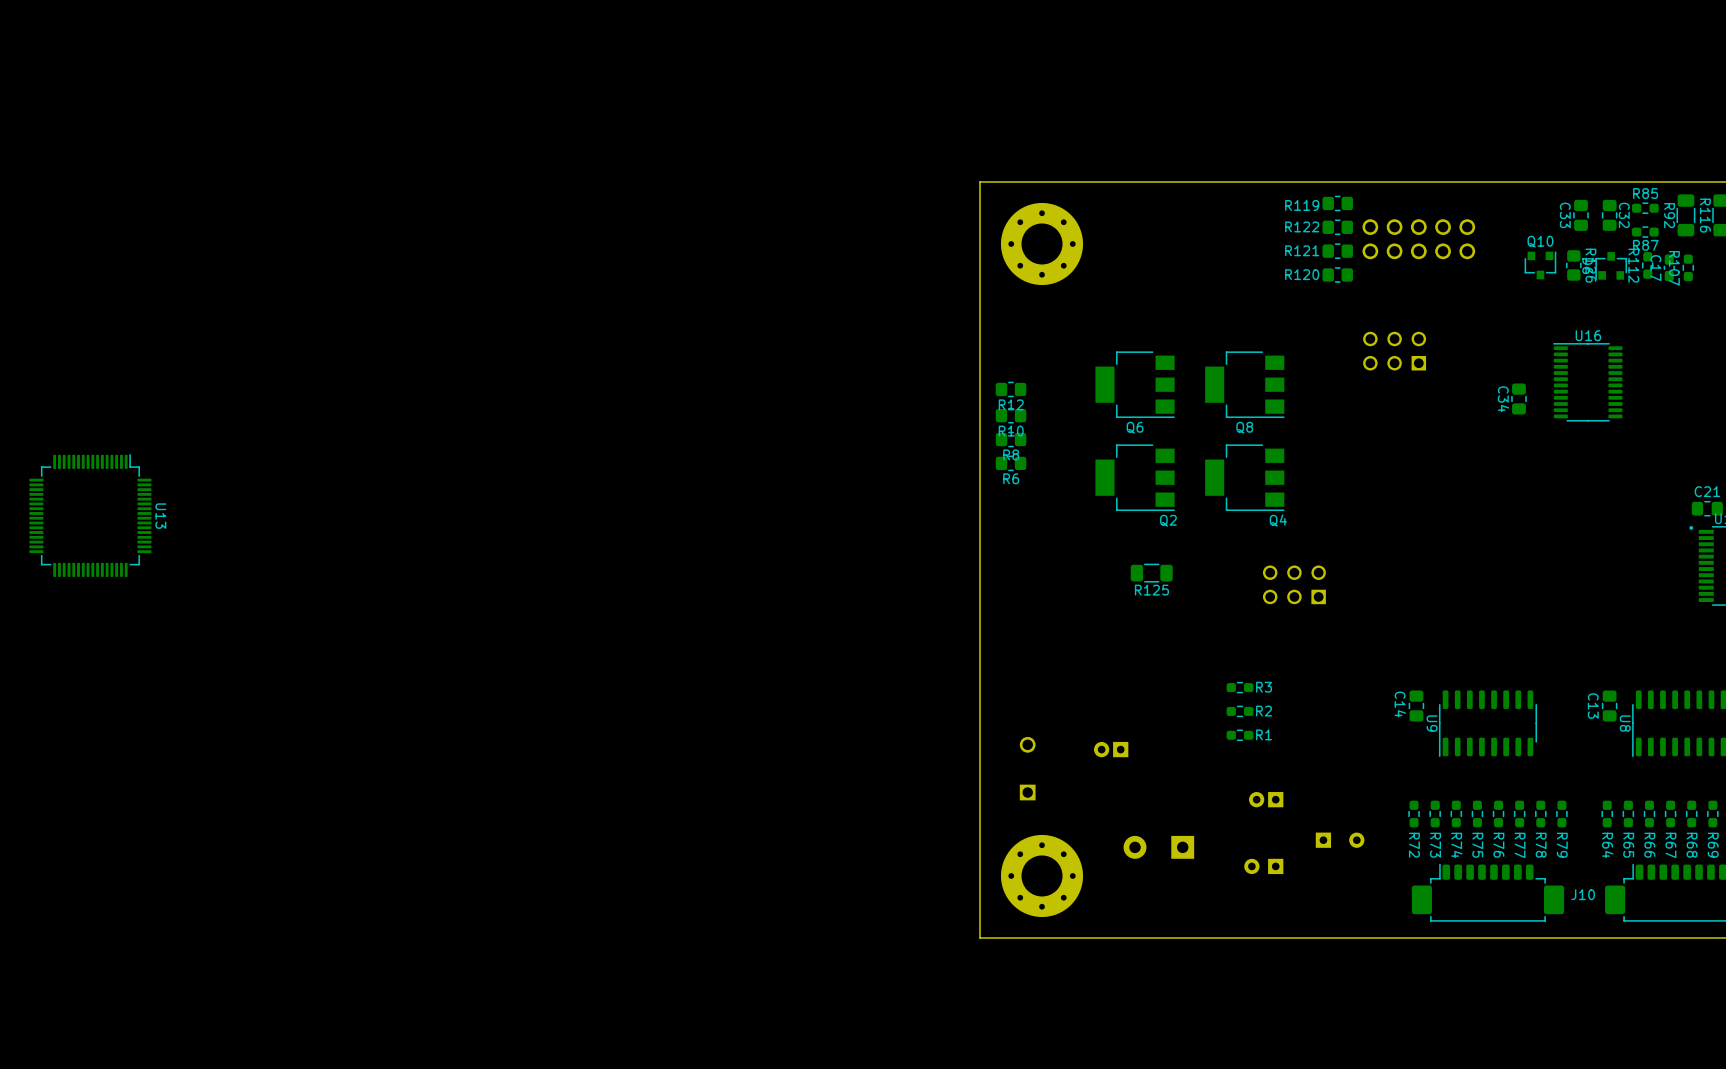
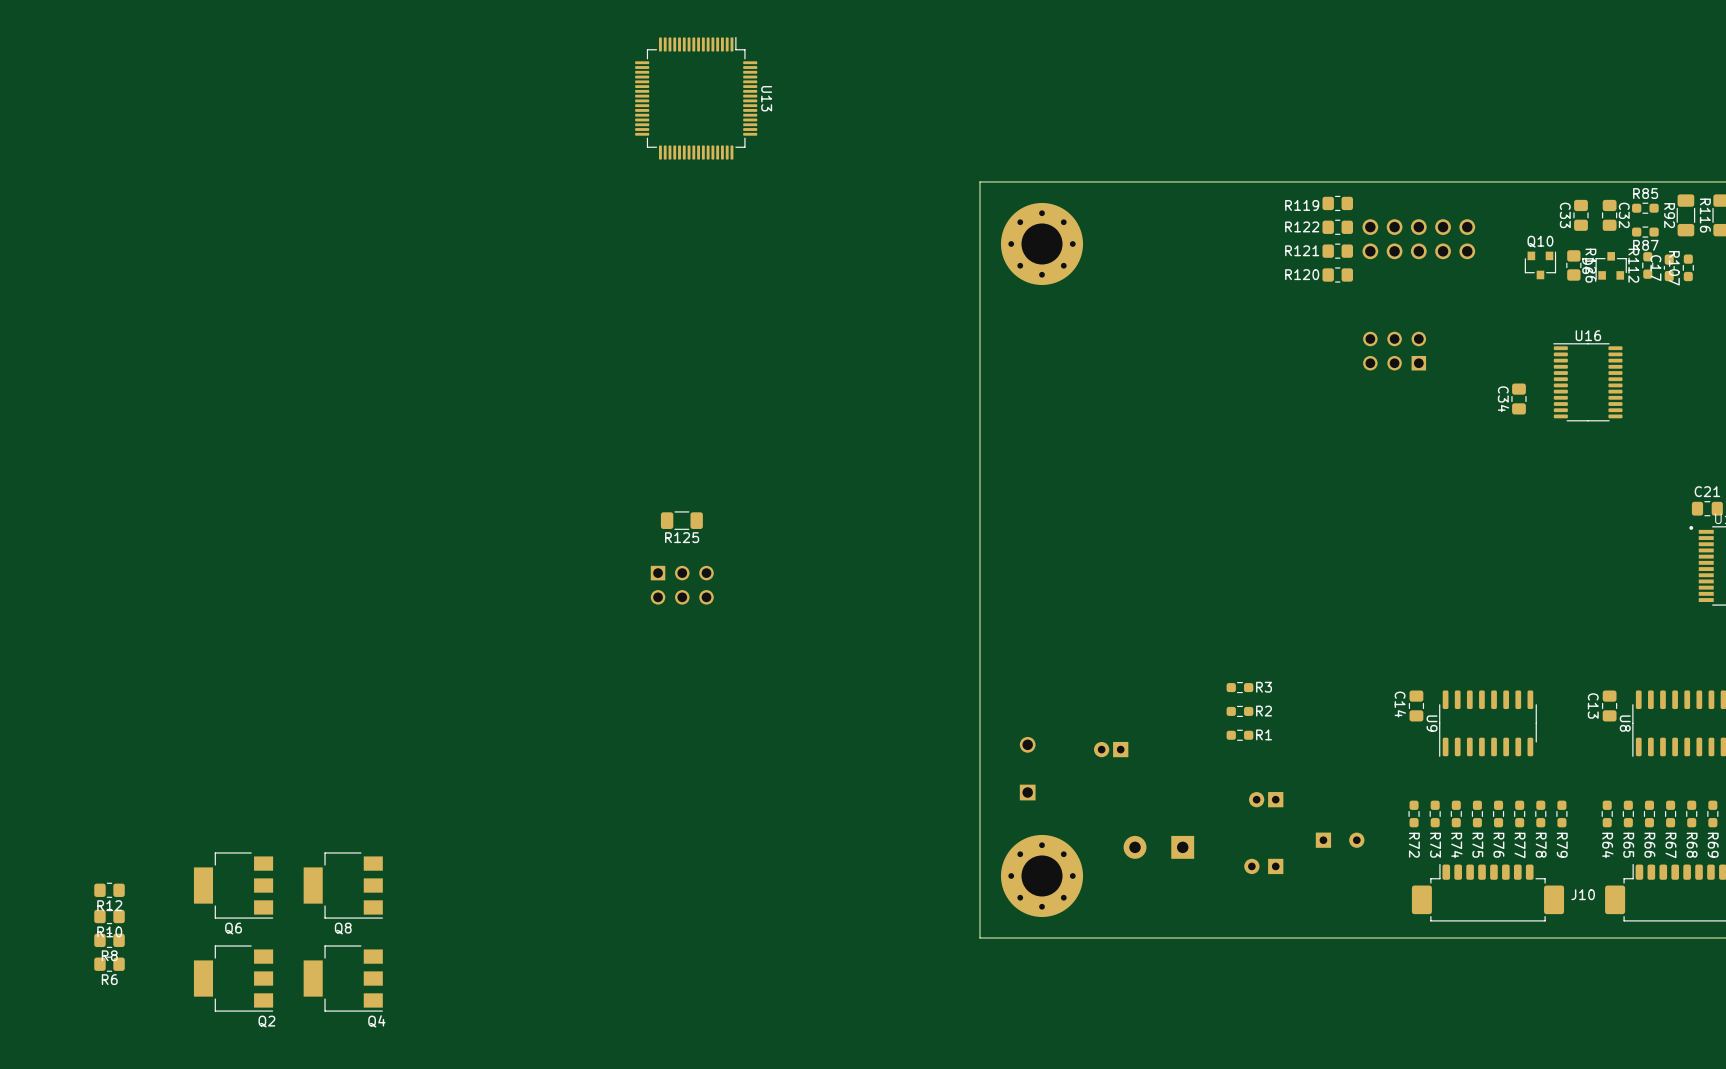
Q6 position: (1135, 384) -> (233, 885)
Q8 position: (1244, 384) -> (343, 885)
R12 position: (1011, 389) -> (109, 890)
R10 position: (1011, 415) -> (109, 916)
R8 position: (1011, 439) -> (109, 940)
R6 position: (1011, 463) -> (109, 964)
Q2 position: (1135, 477) -> (233, 978)
Q4 position: (1244, 477) -> (343, 978)
U13 position: (90, 515) -> (696, 98)
R125 position: (1151, 573) -> (681, 520)
part: (1294, 584) -> none
part: none -> (682, 585)

